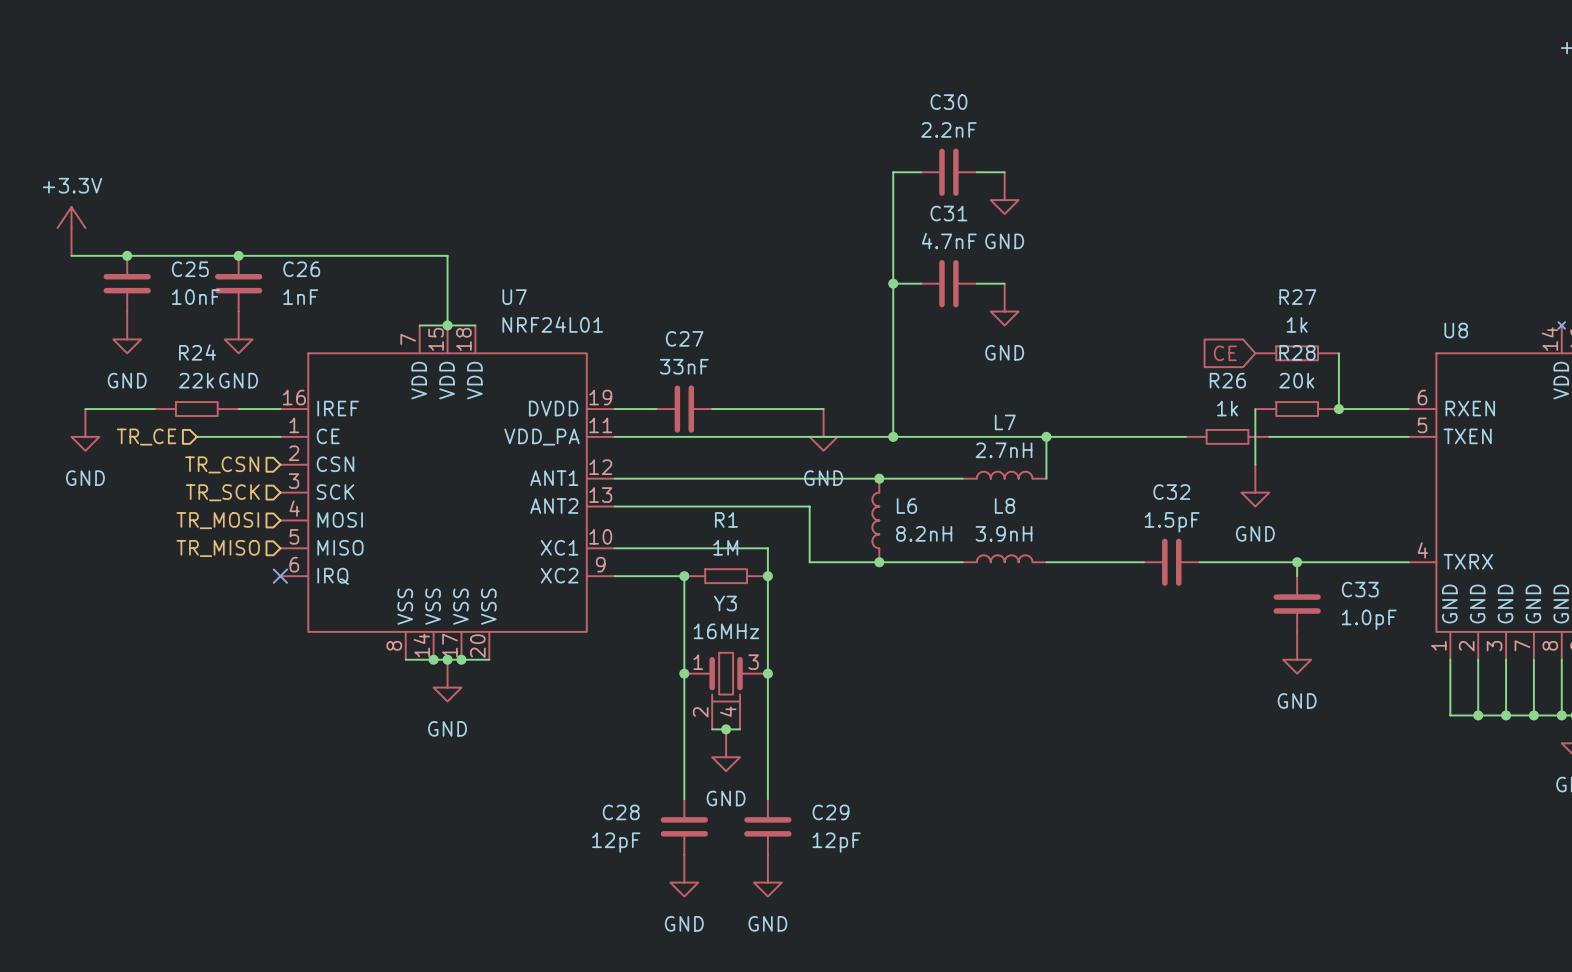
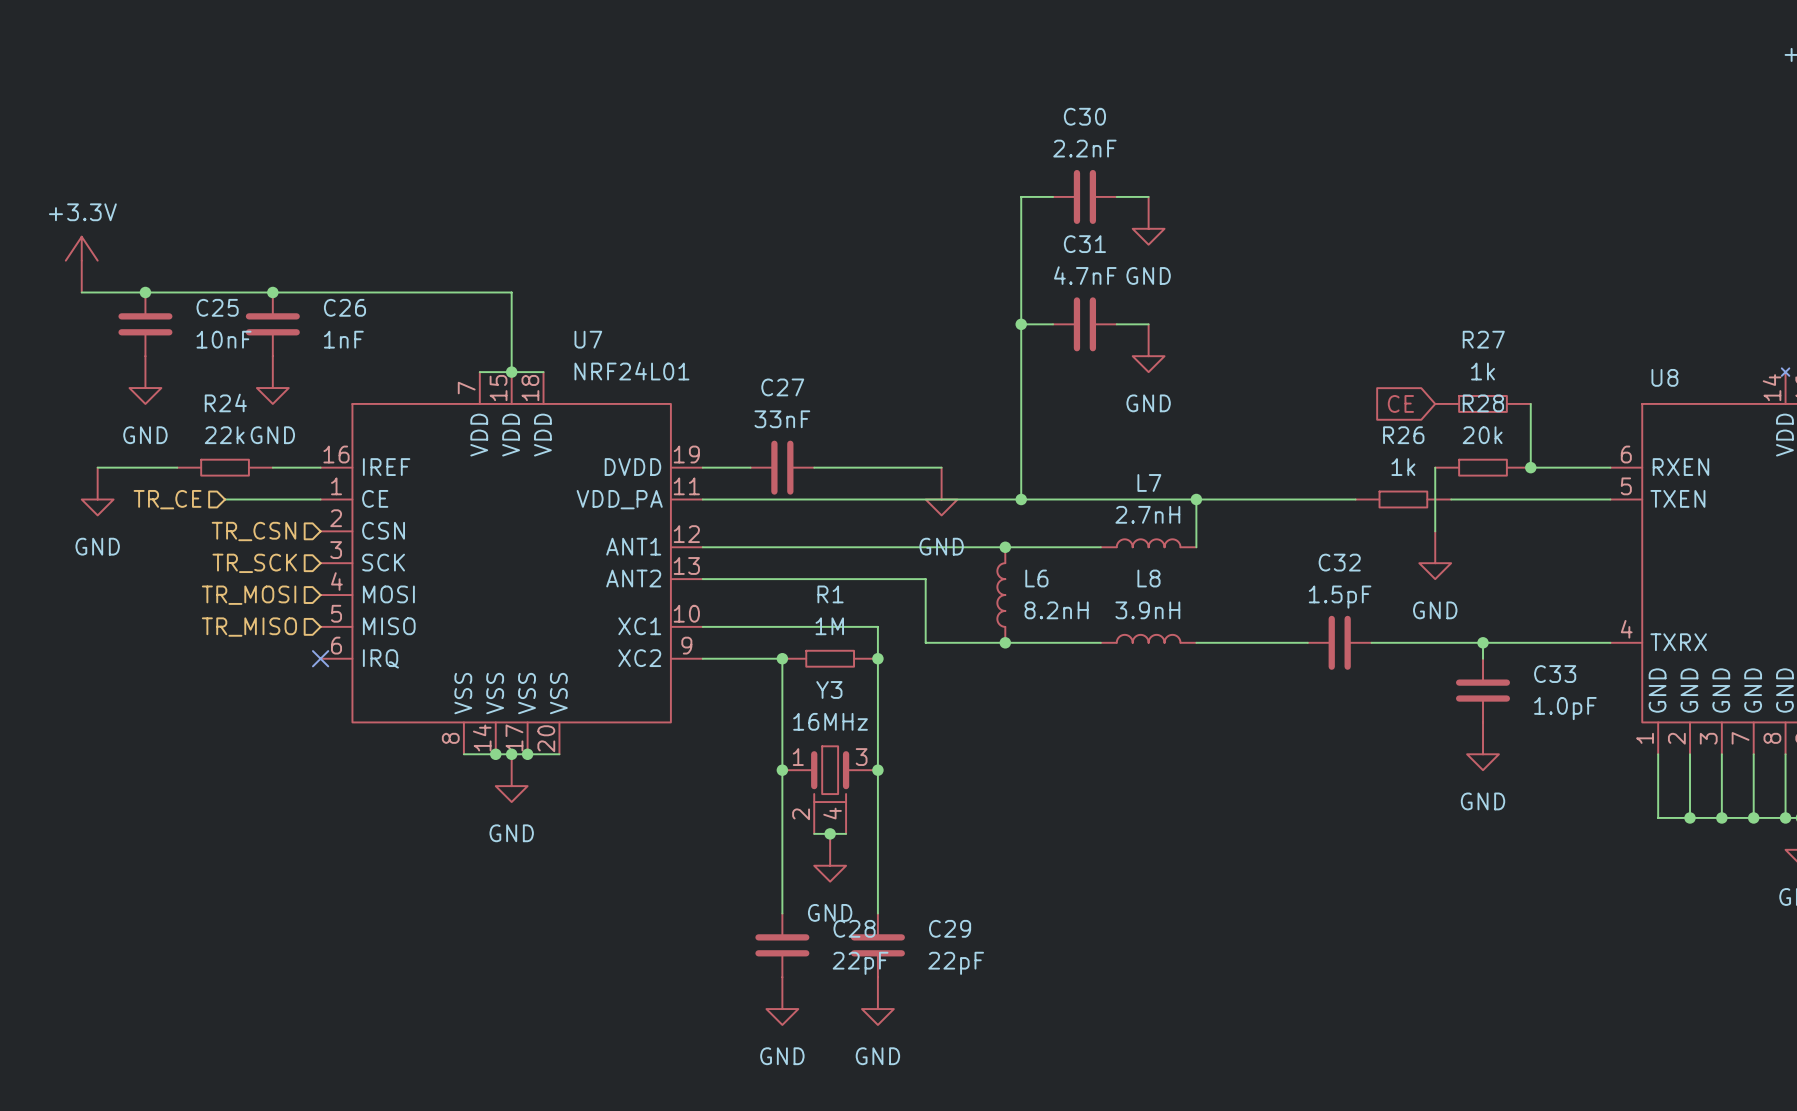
C28 name position: C28 (621, 812) -> C28 (854, 928)
C28 value: 12pF (616, 842) -> 22pF (860, 963)
C29 value: 12pF (836, 842) -> 22pF (956, 963)

